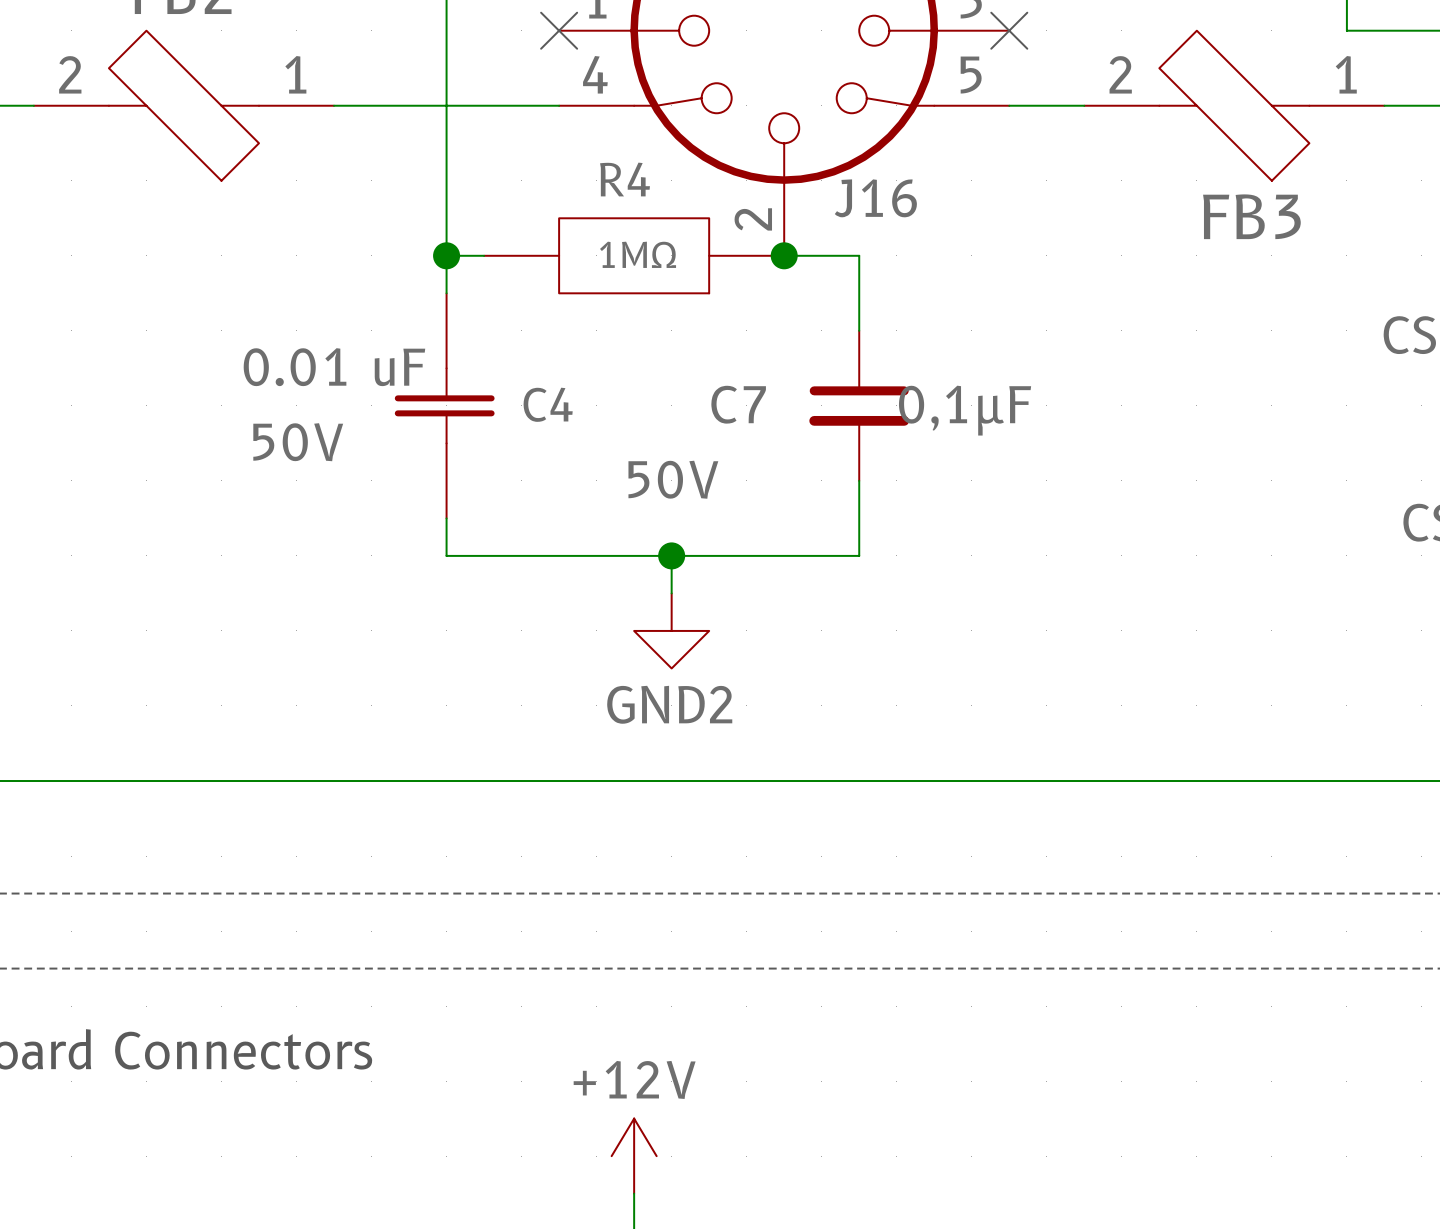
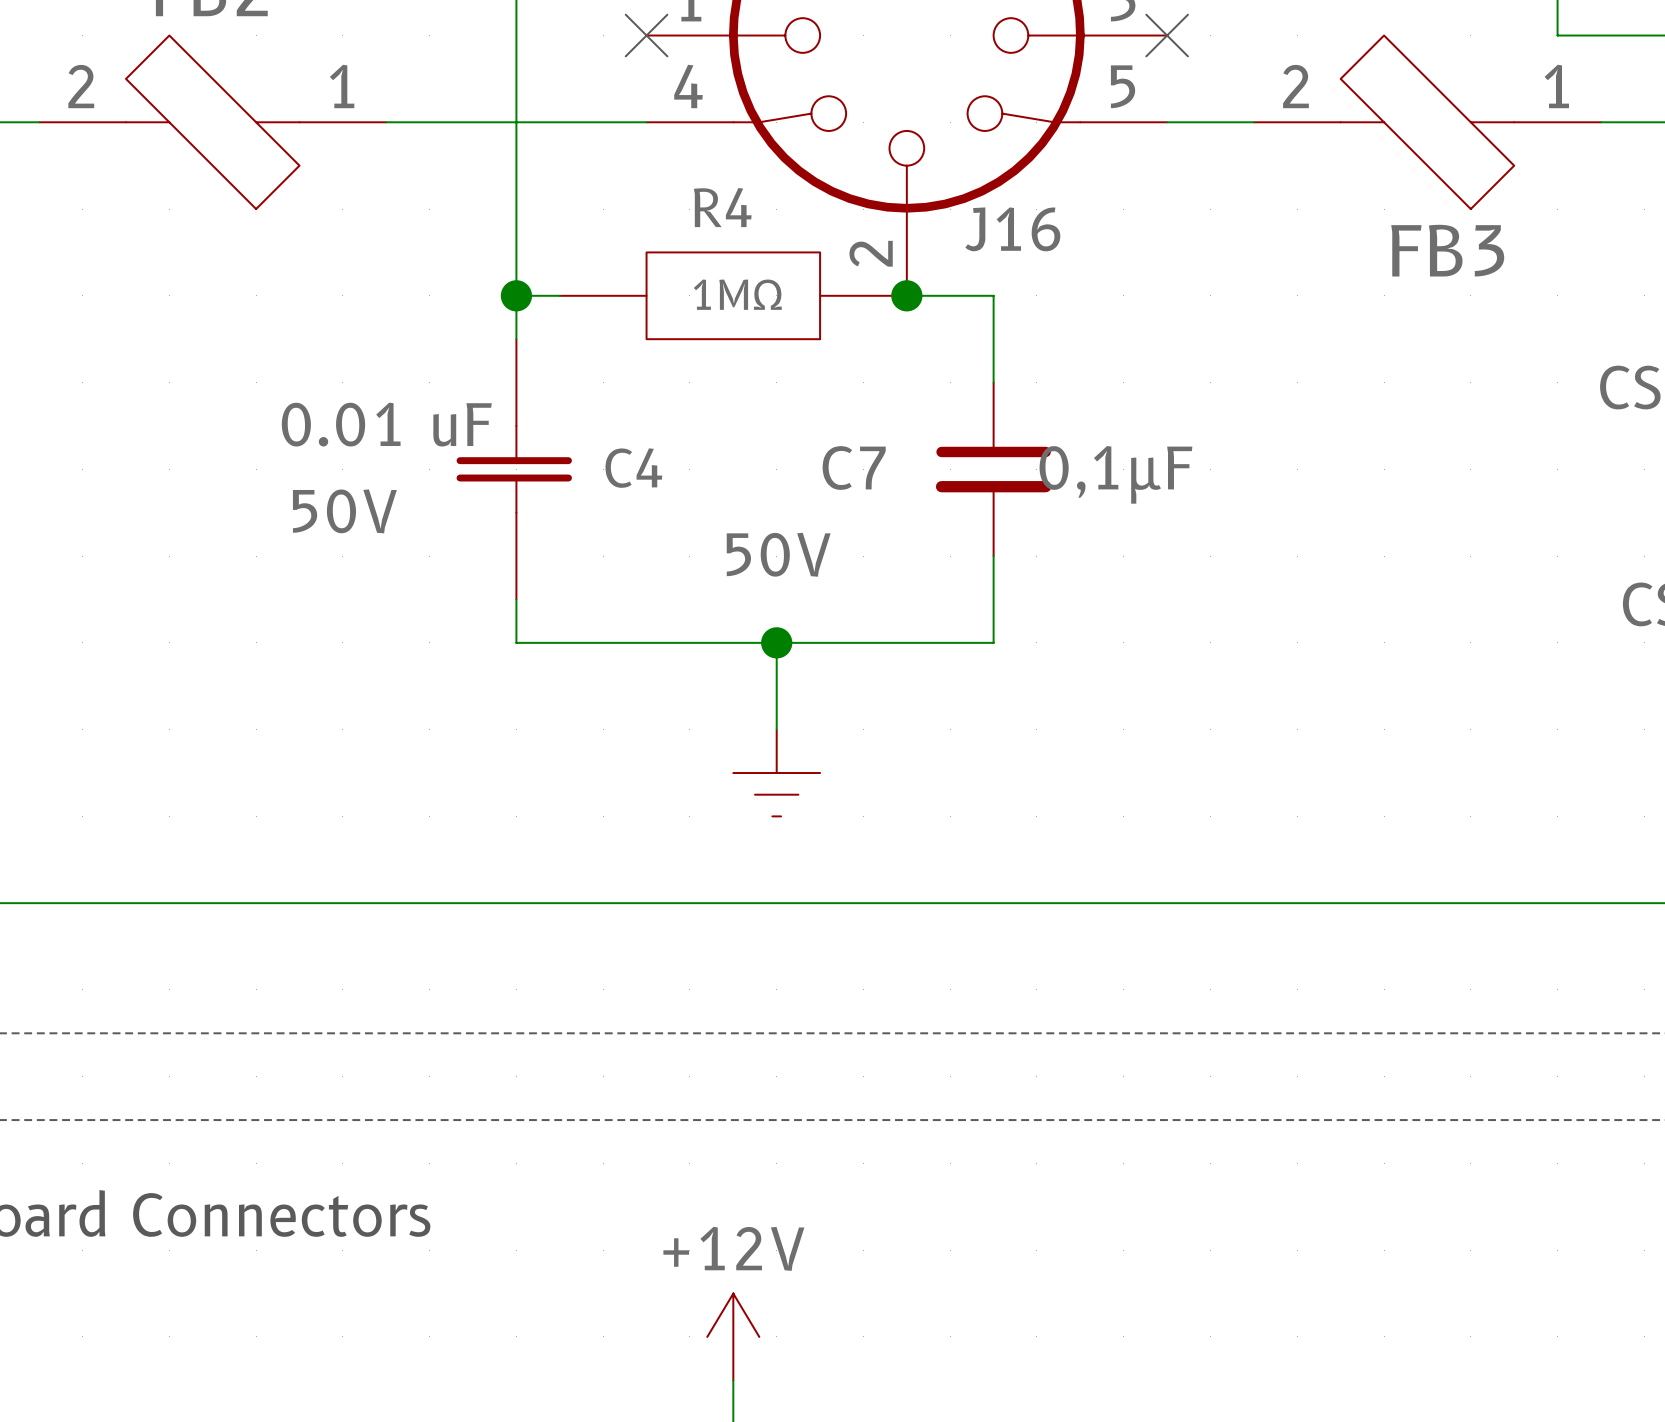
power symbol: GND2 (671, 630) -> none
power symbol: none -> (776, 773)

